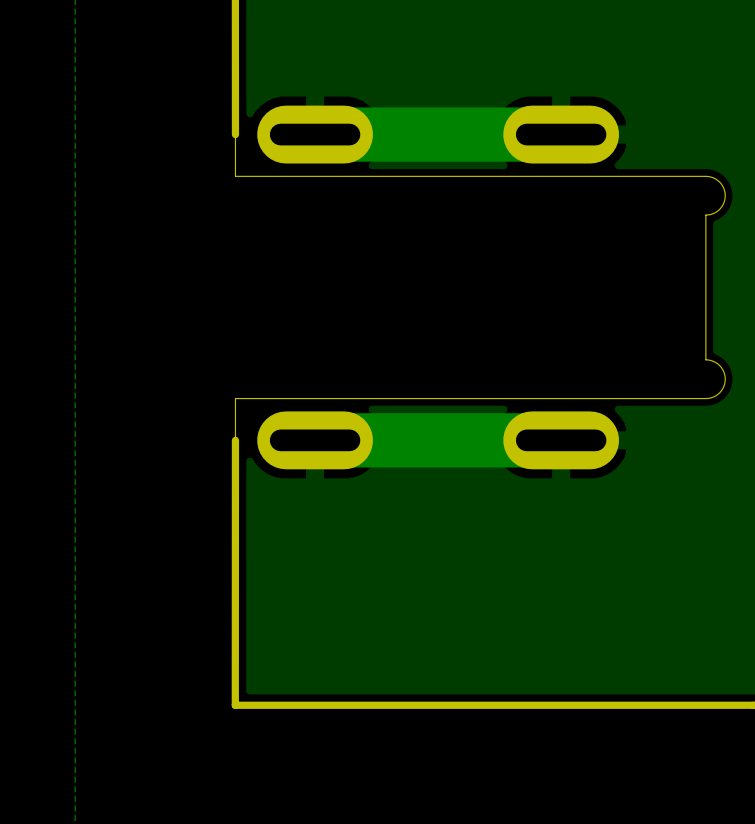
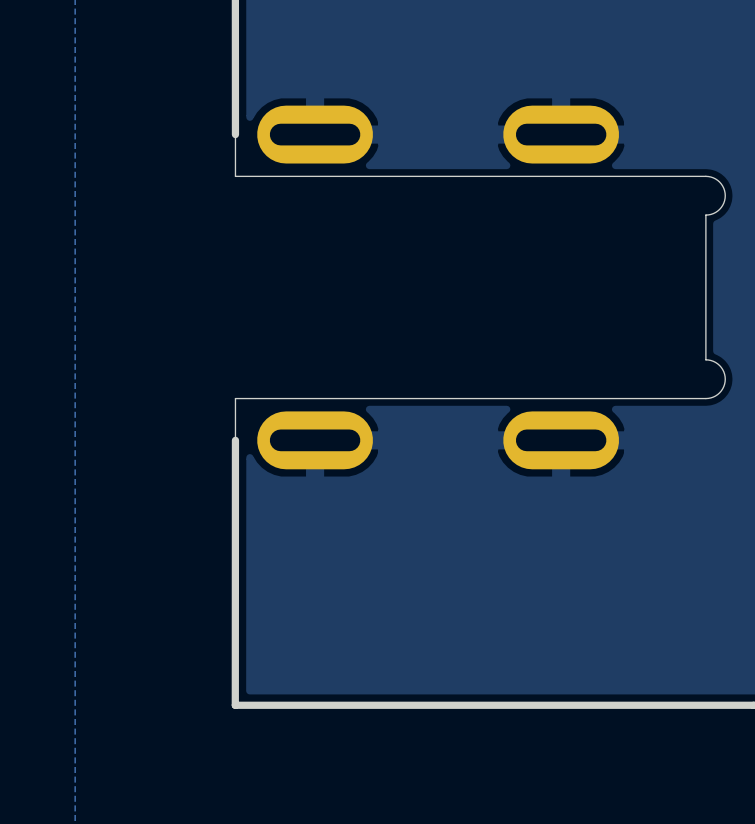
track: (561, 134) (315, 134) -> none
track: (561, 440) (315, 440) -> none

